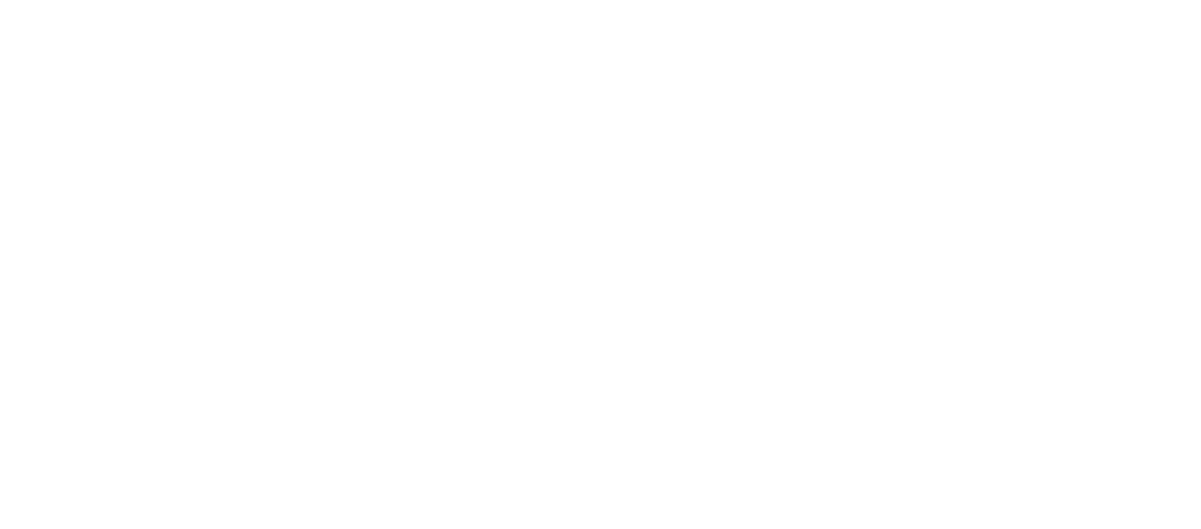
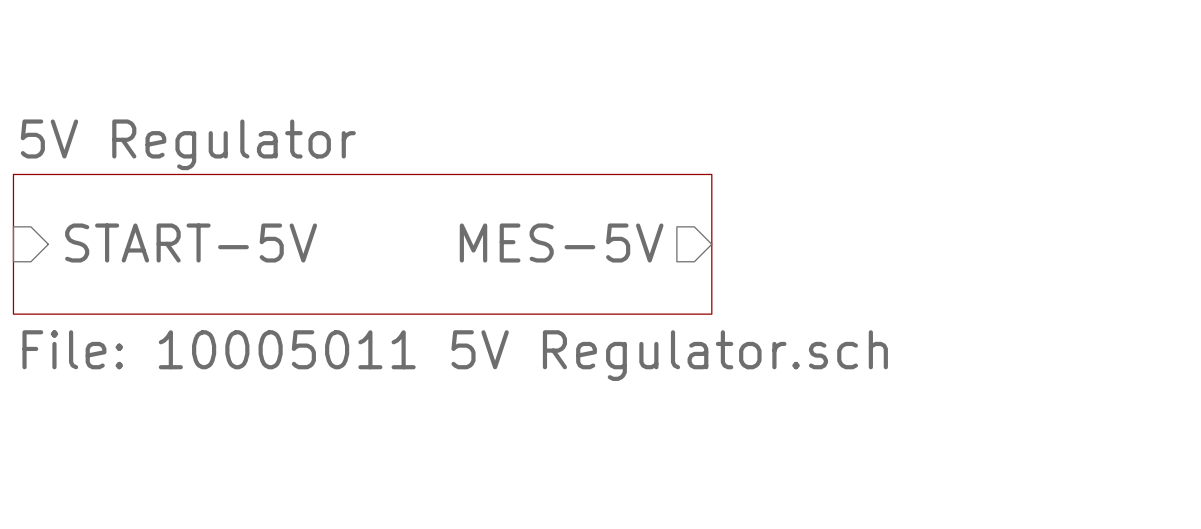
sheet pin: none -> START-5V (191, 243)
sheet pin: none -> MES-5V (561, 243)
sheet 5V Regulator: none -> File: 10005011 5V Regulator.sch (362, 244)

